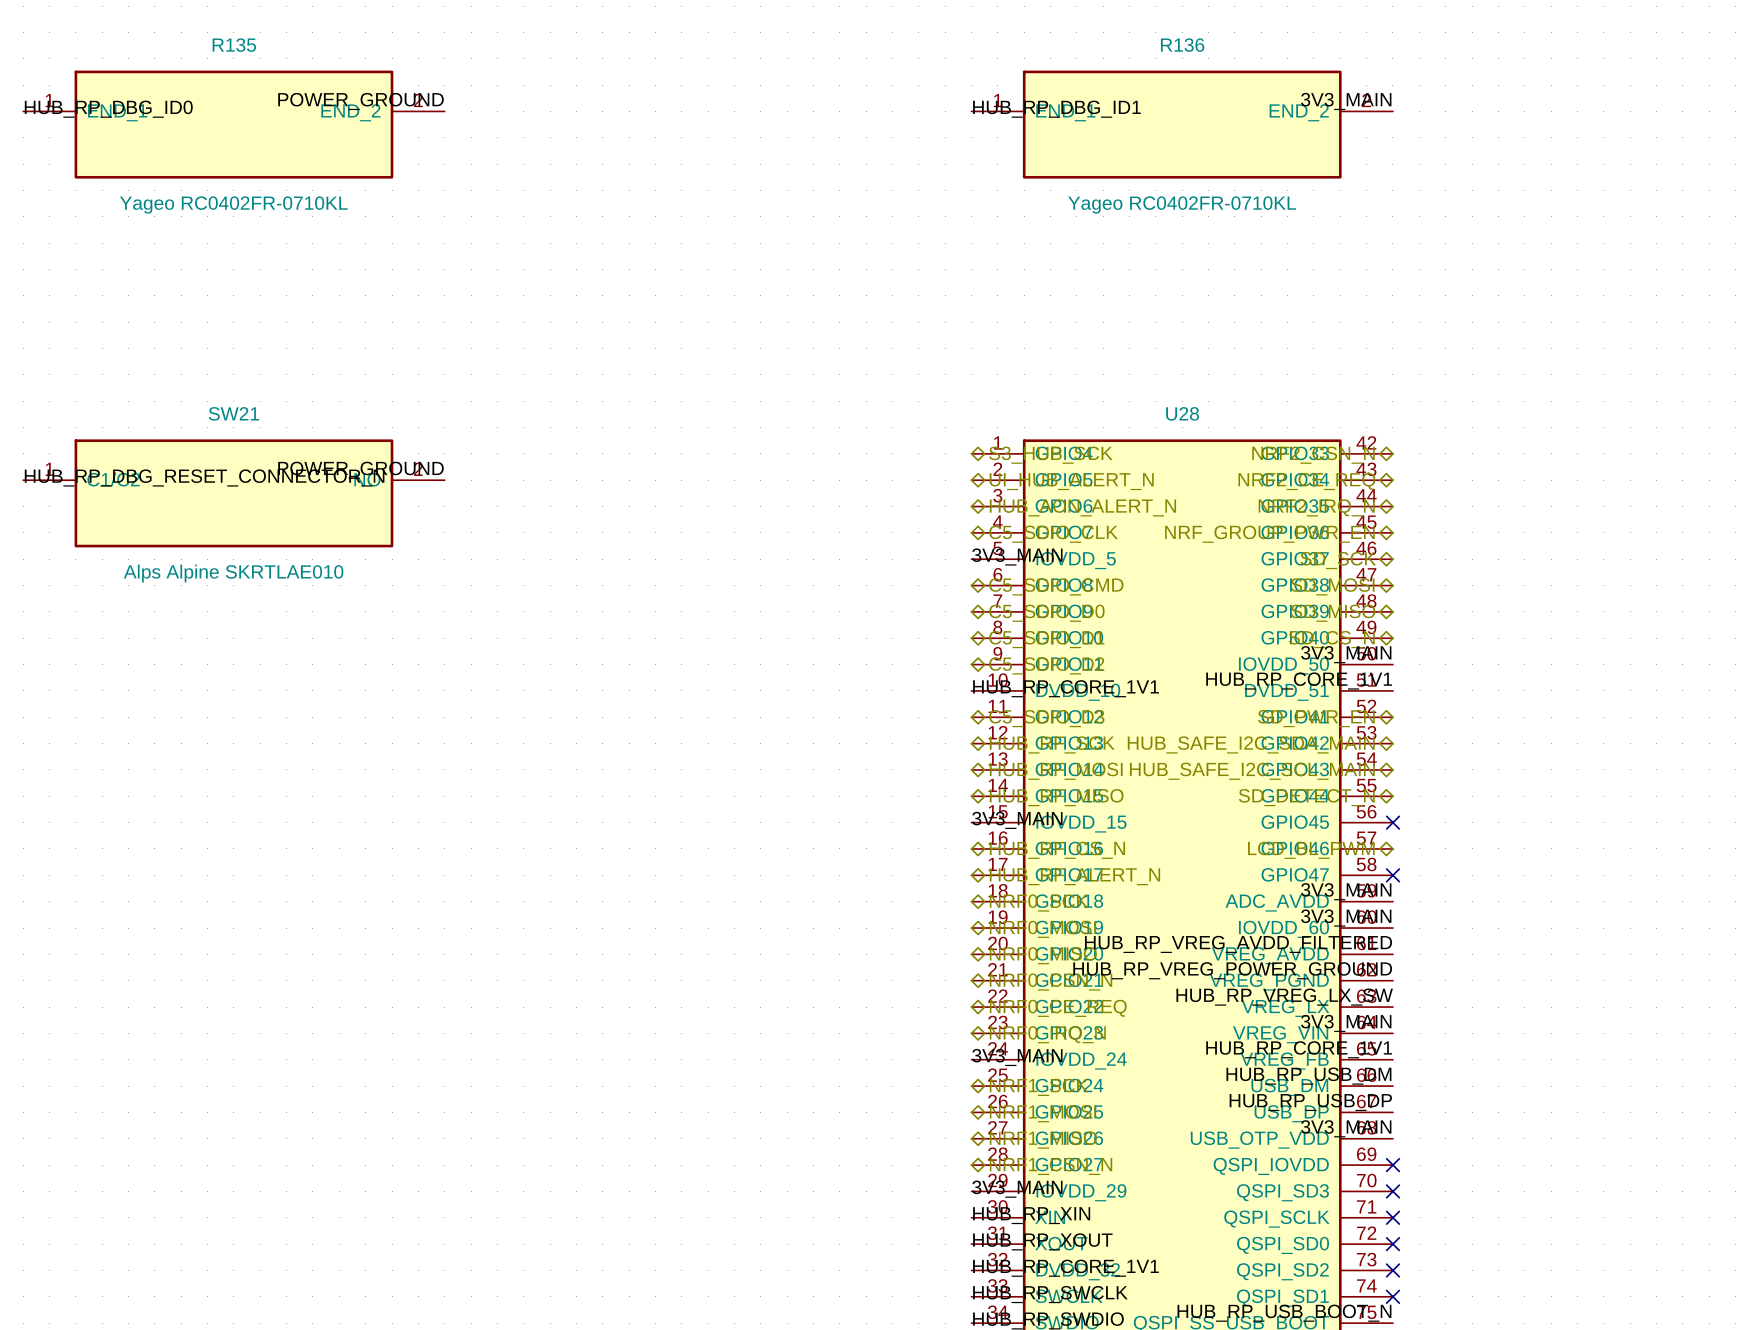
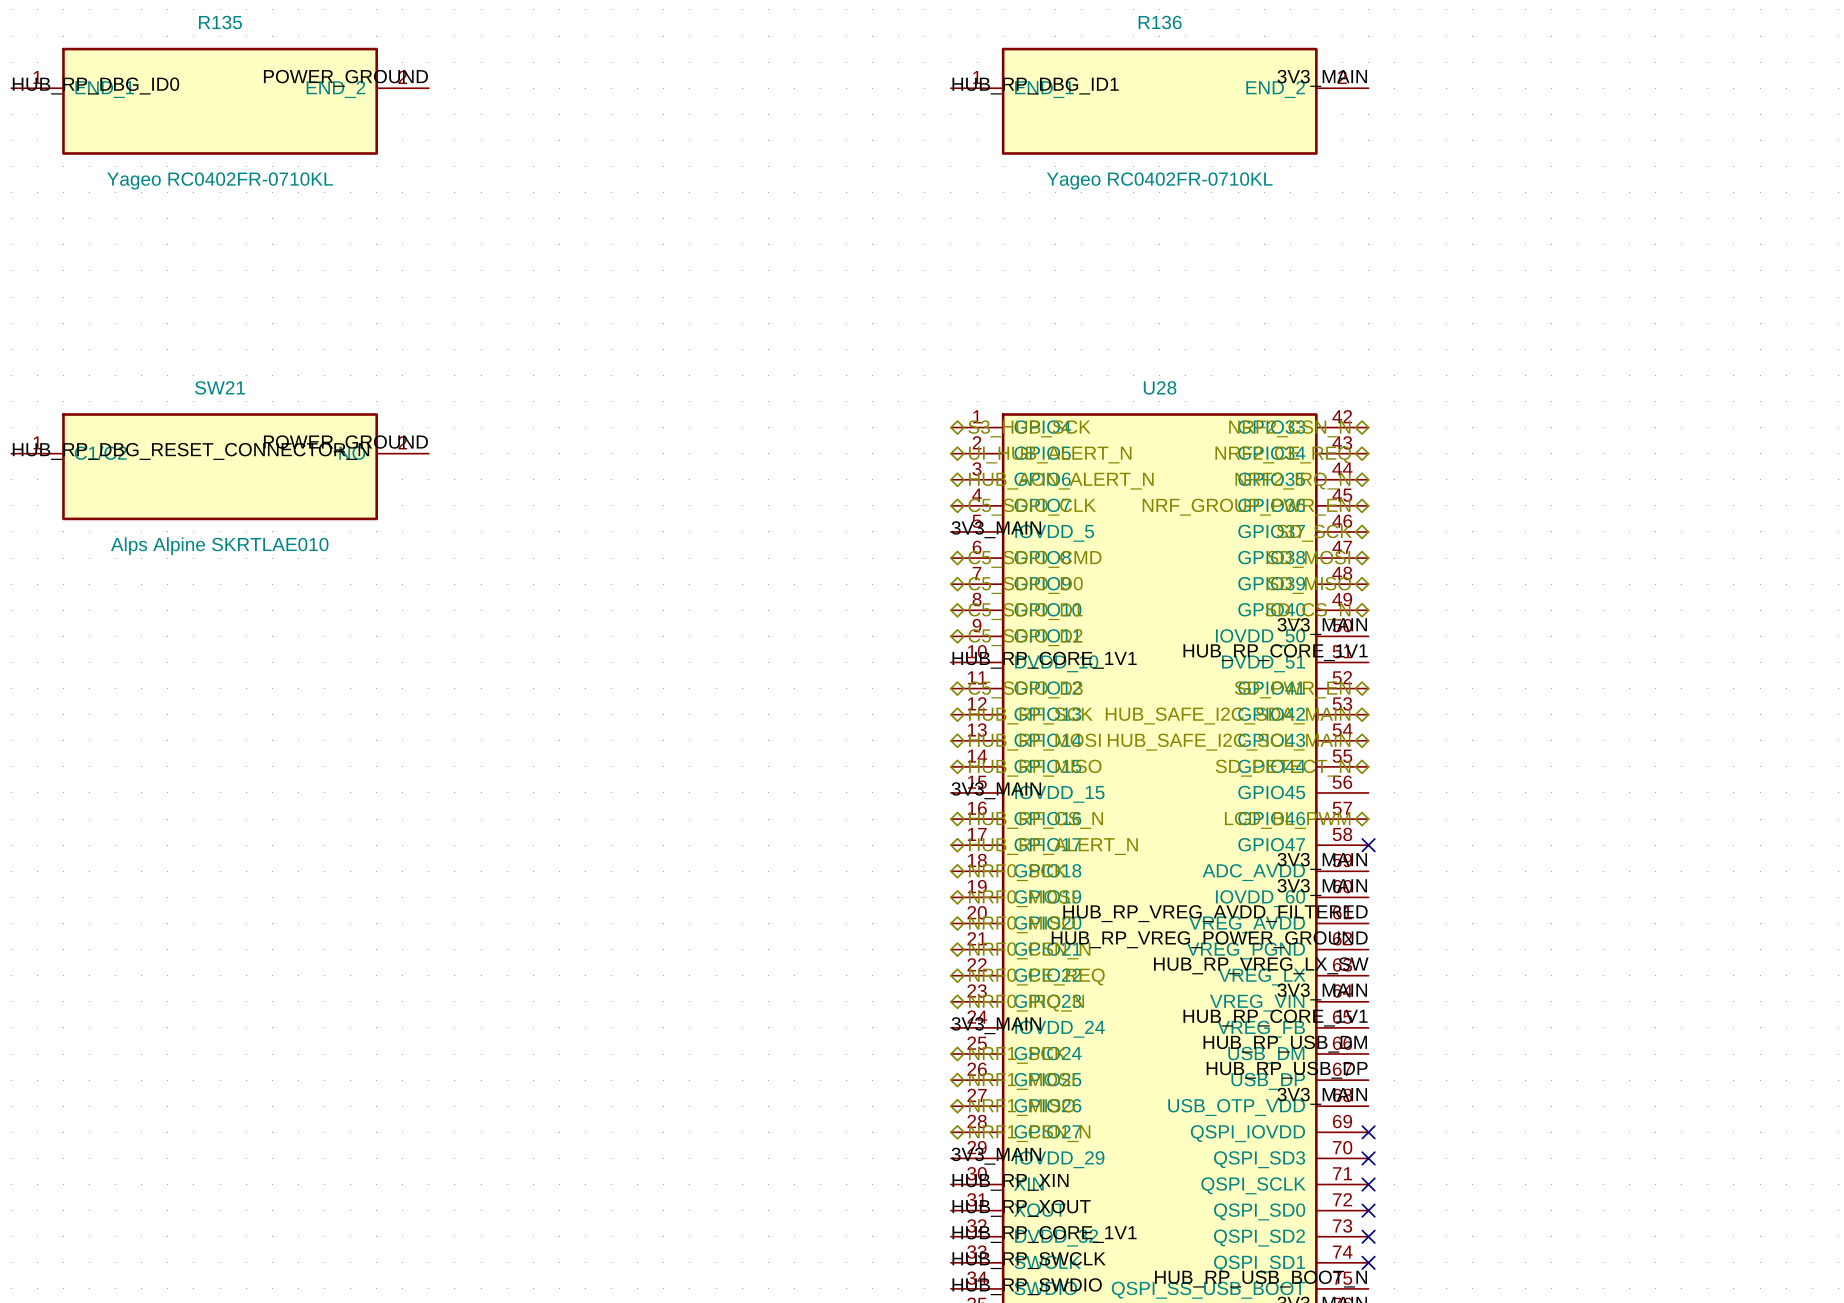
no-connect mark: (1392, 822) -> none

